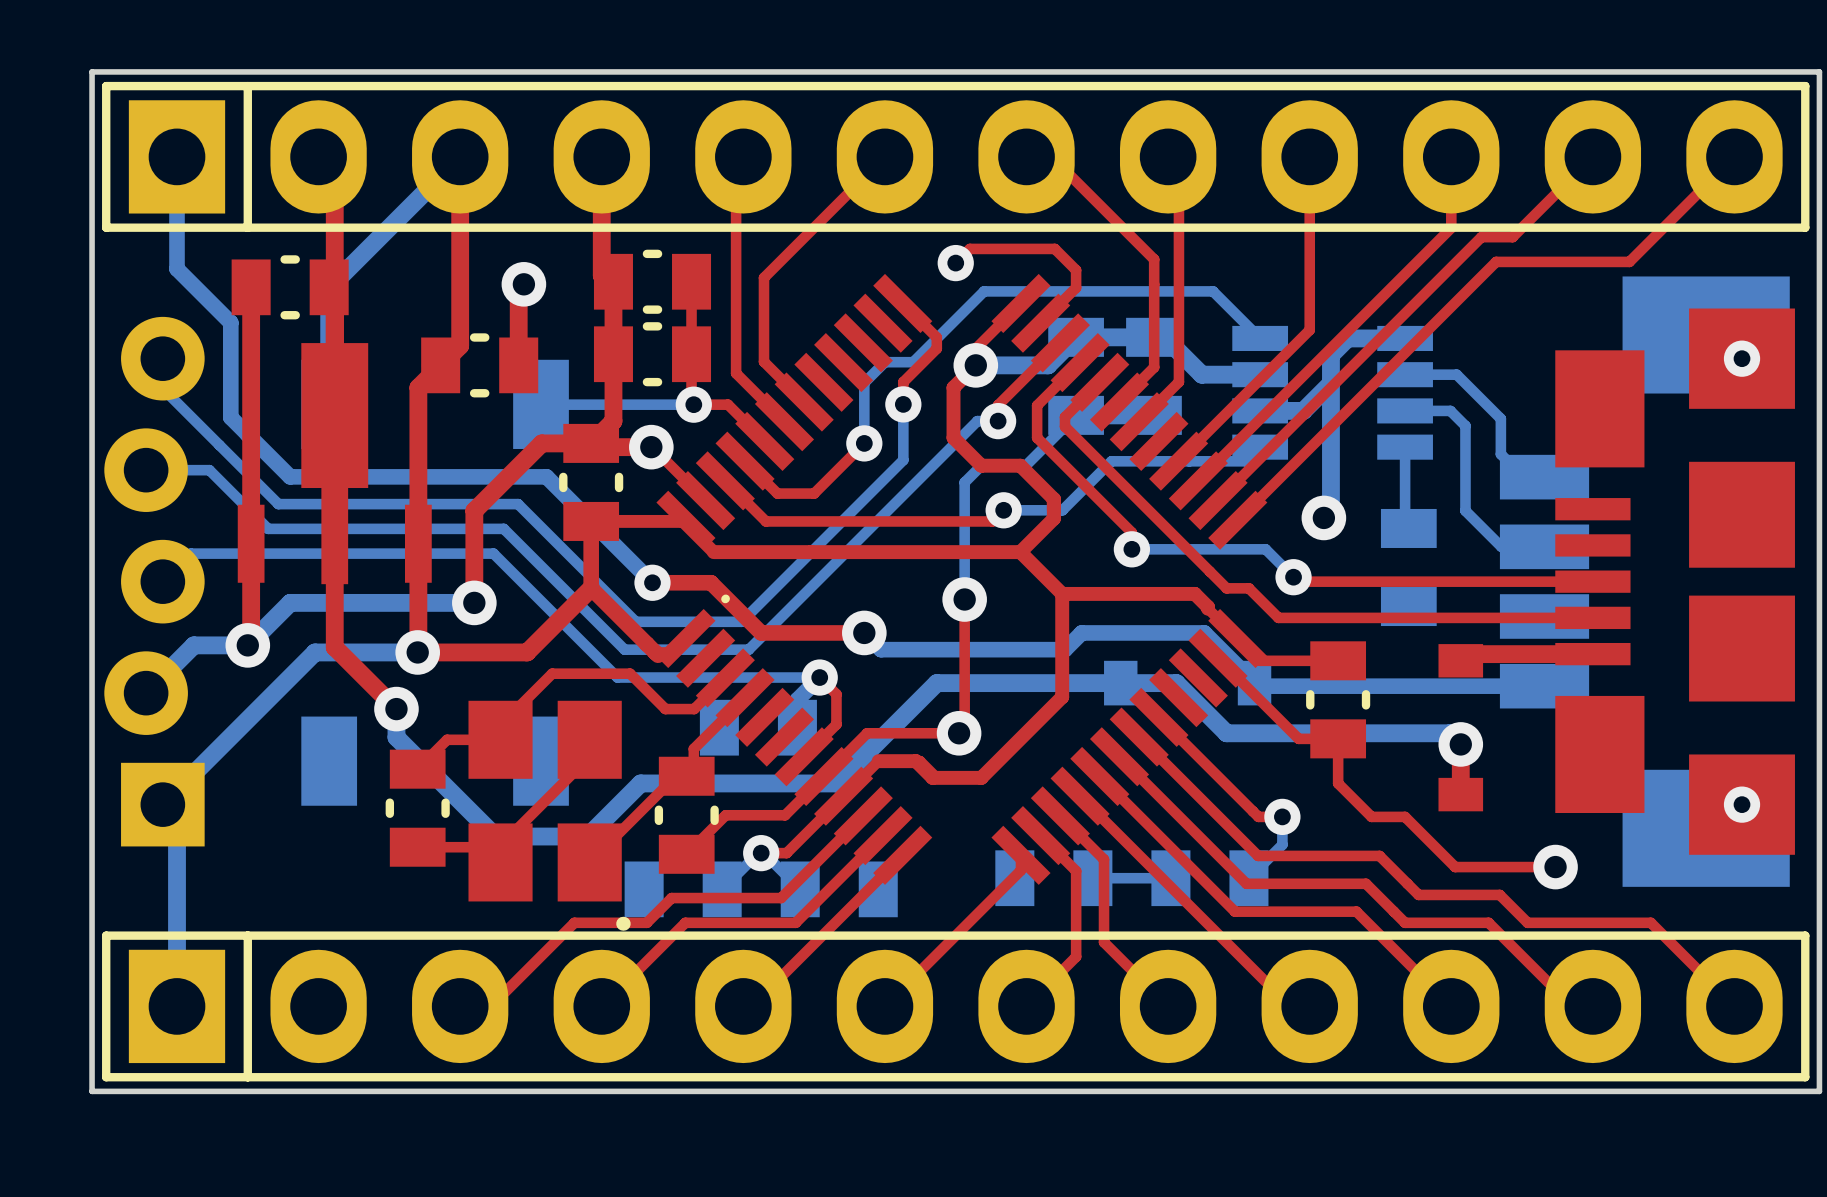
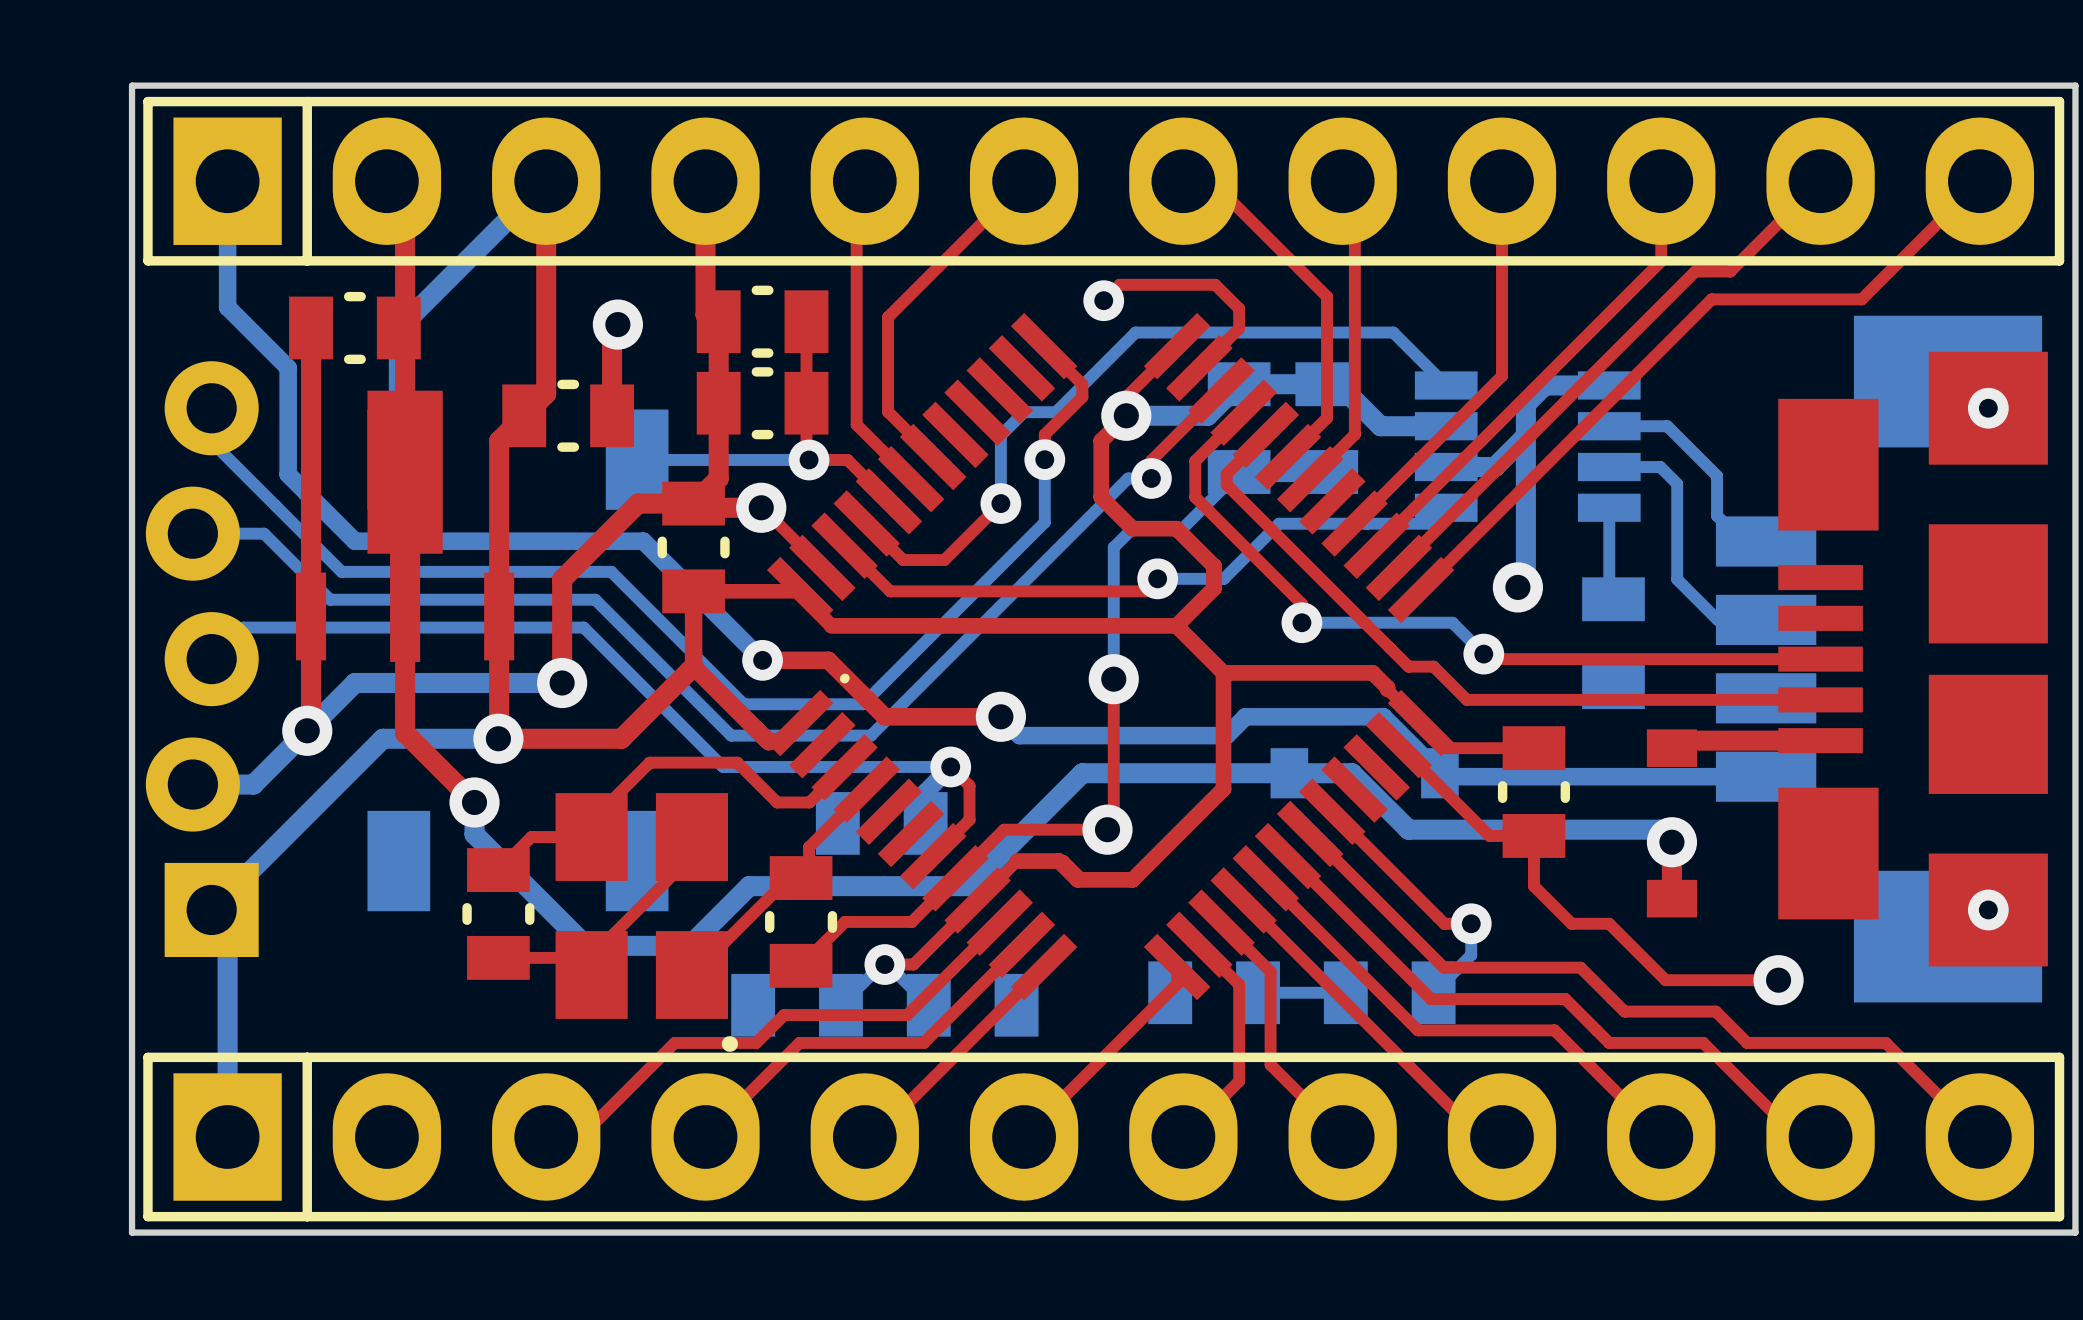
bottom track: (247, 645) (193, 645) (146, 693) -> (307, 730) (253, 784) (221, 784)

